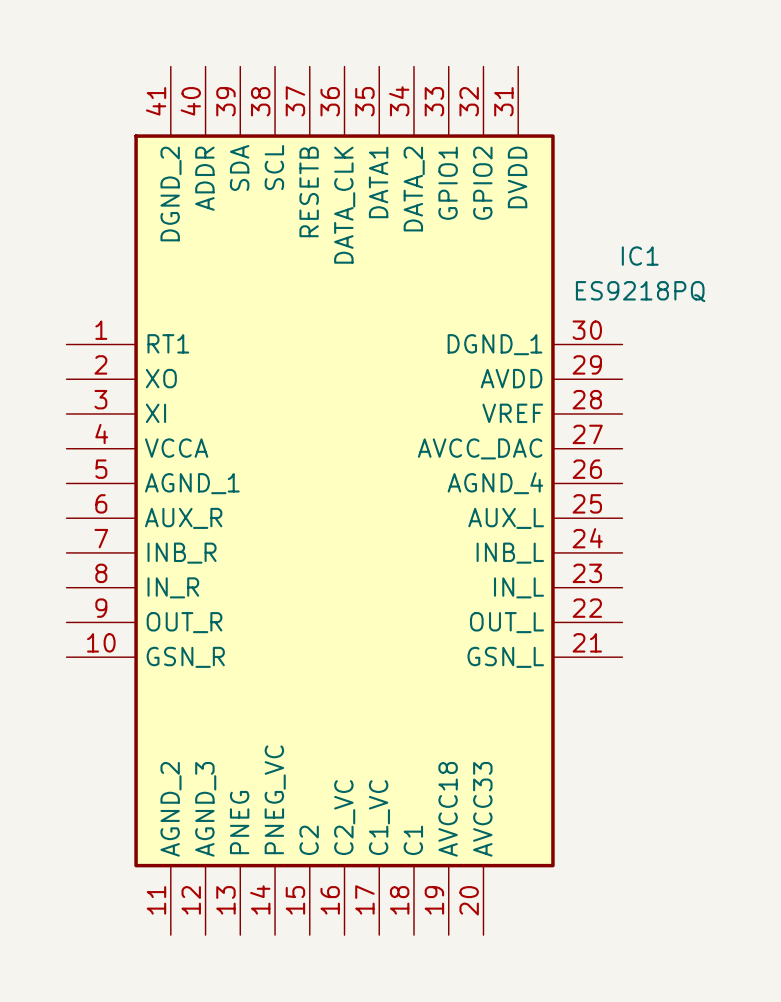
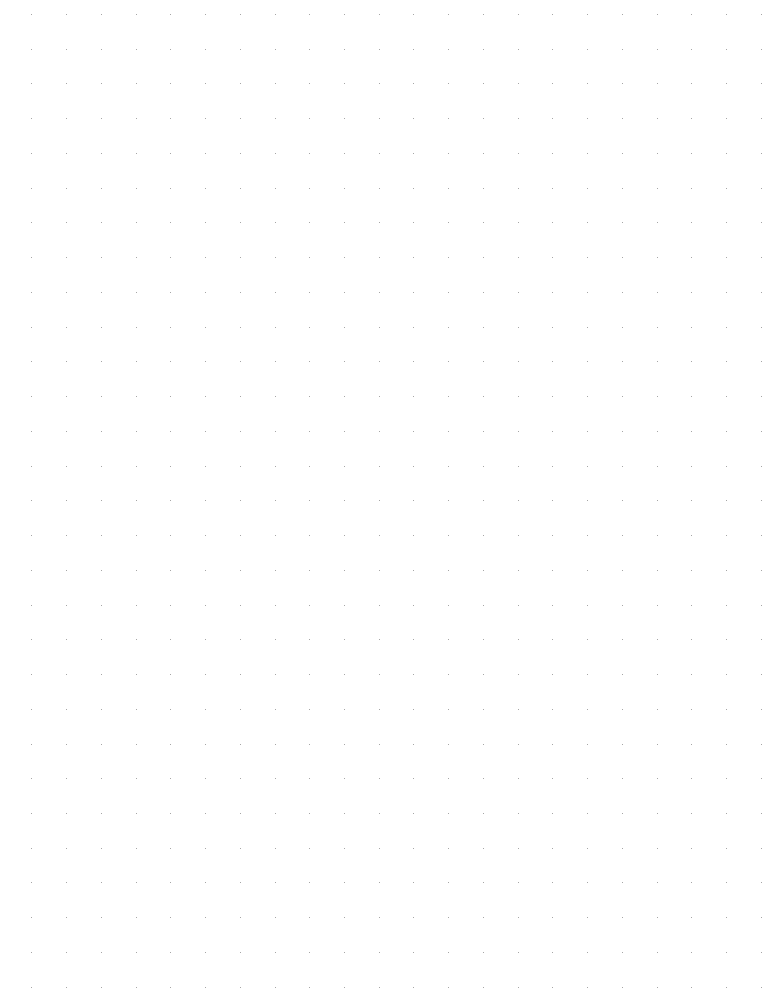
IC1: ES9218PQ (344, 500) -> none

